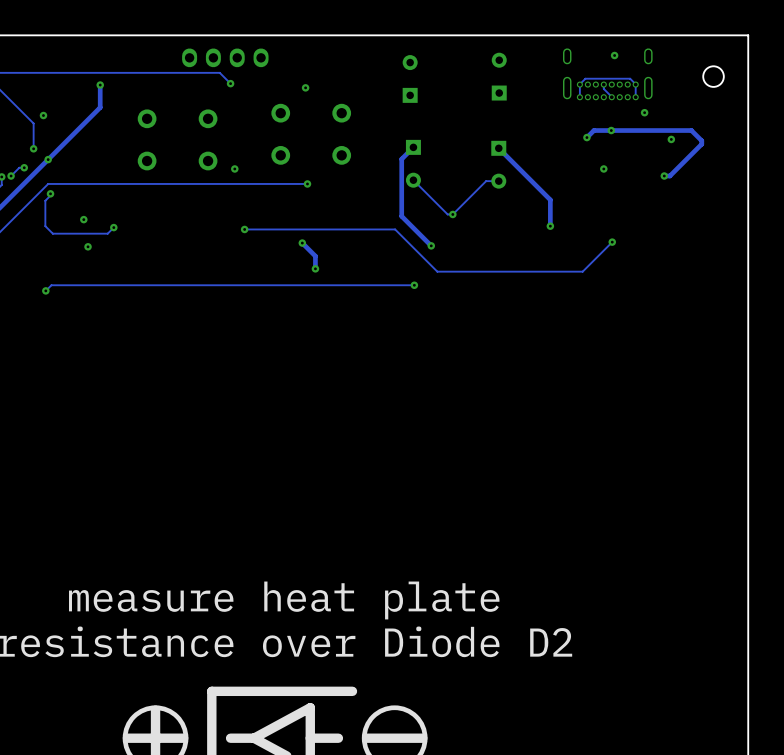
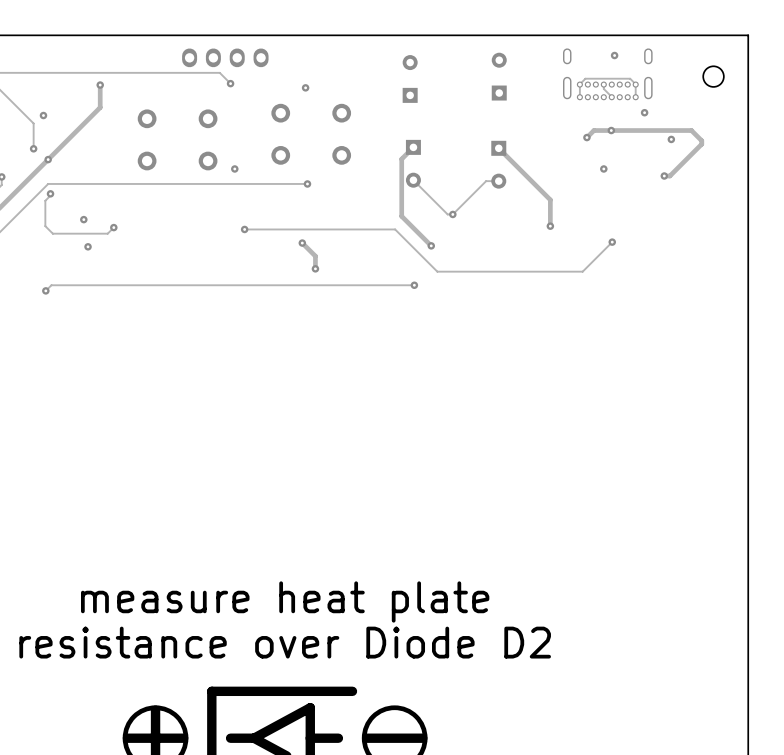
track: (24, 167) (19, 167) (11, 176) -> none
via: (24, 167) -> none
via: (11, 176) -> none

